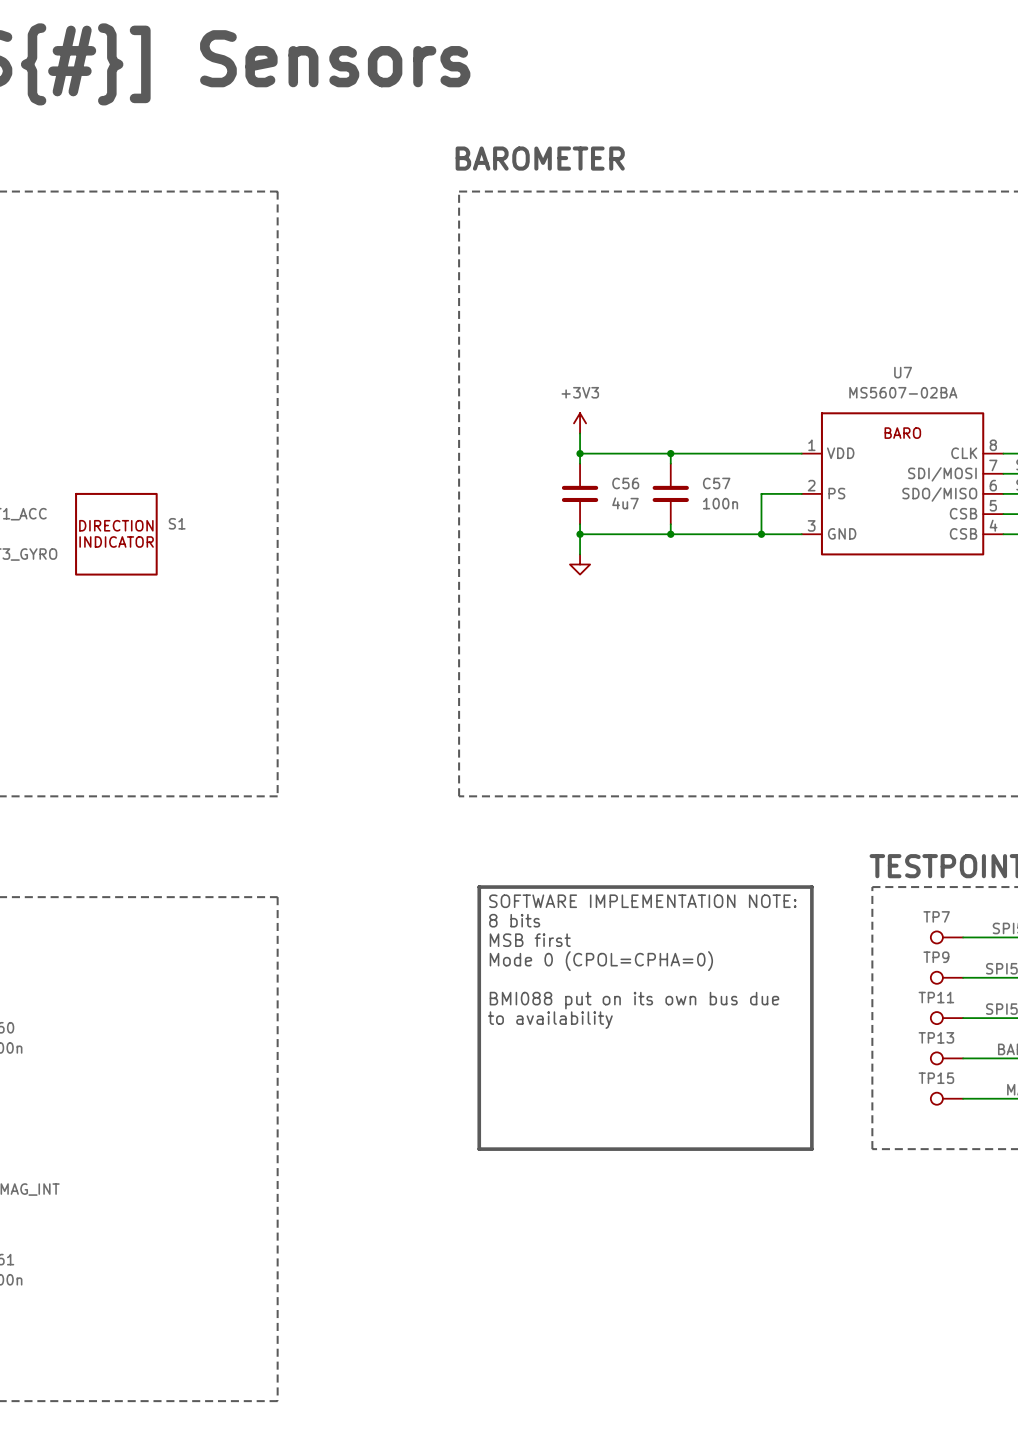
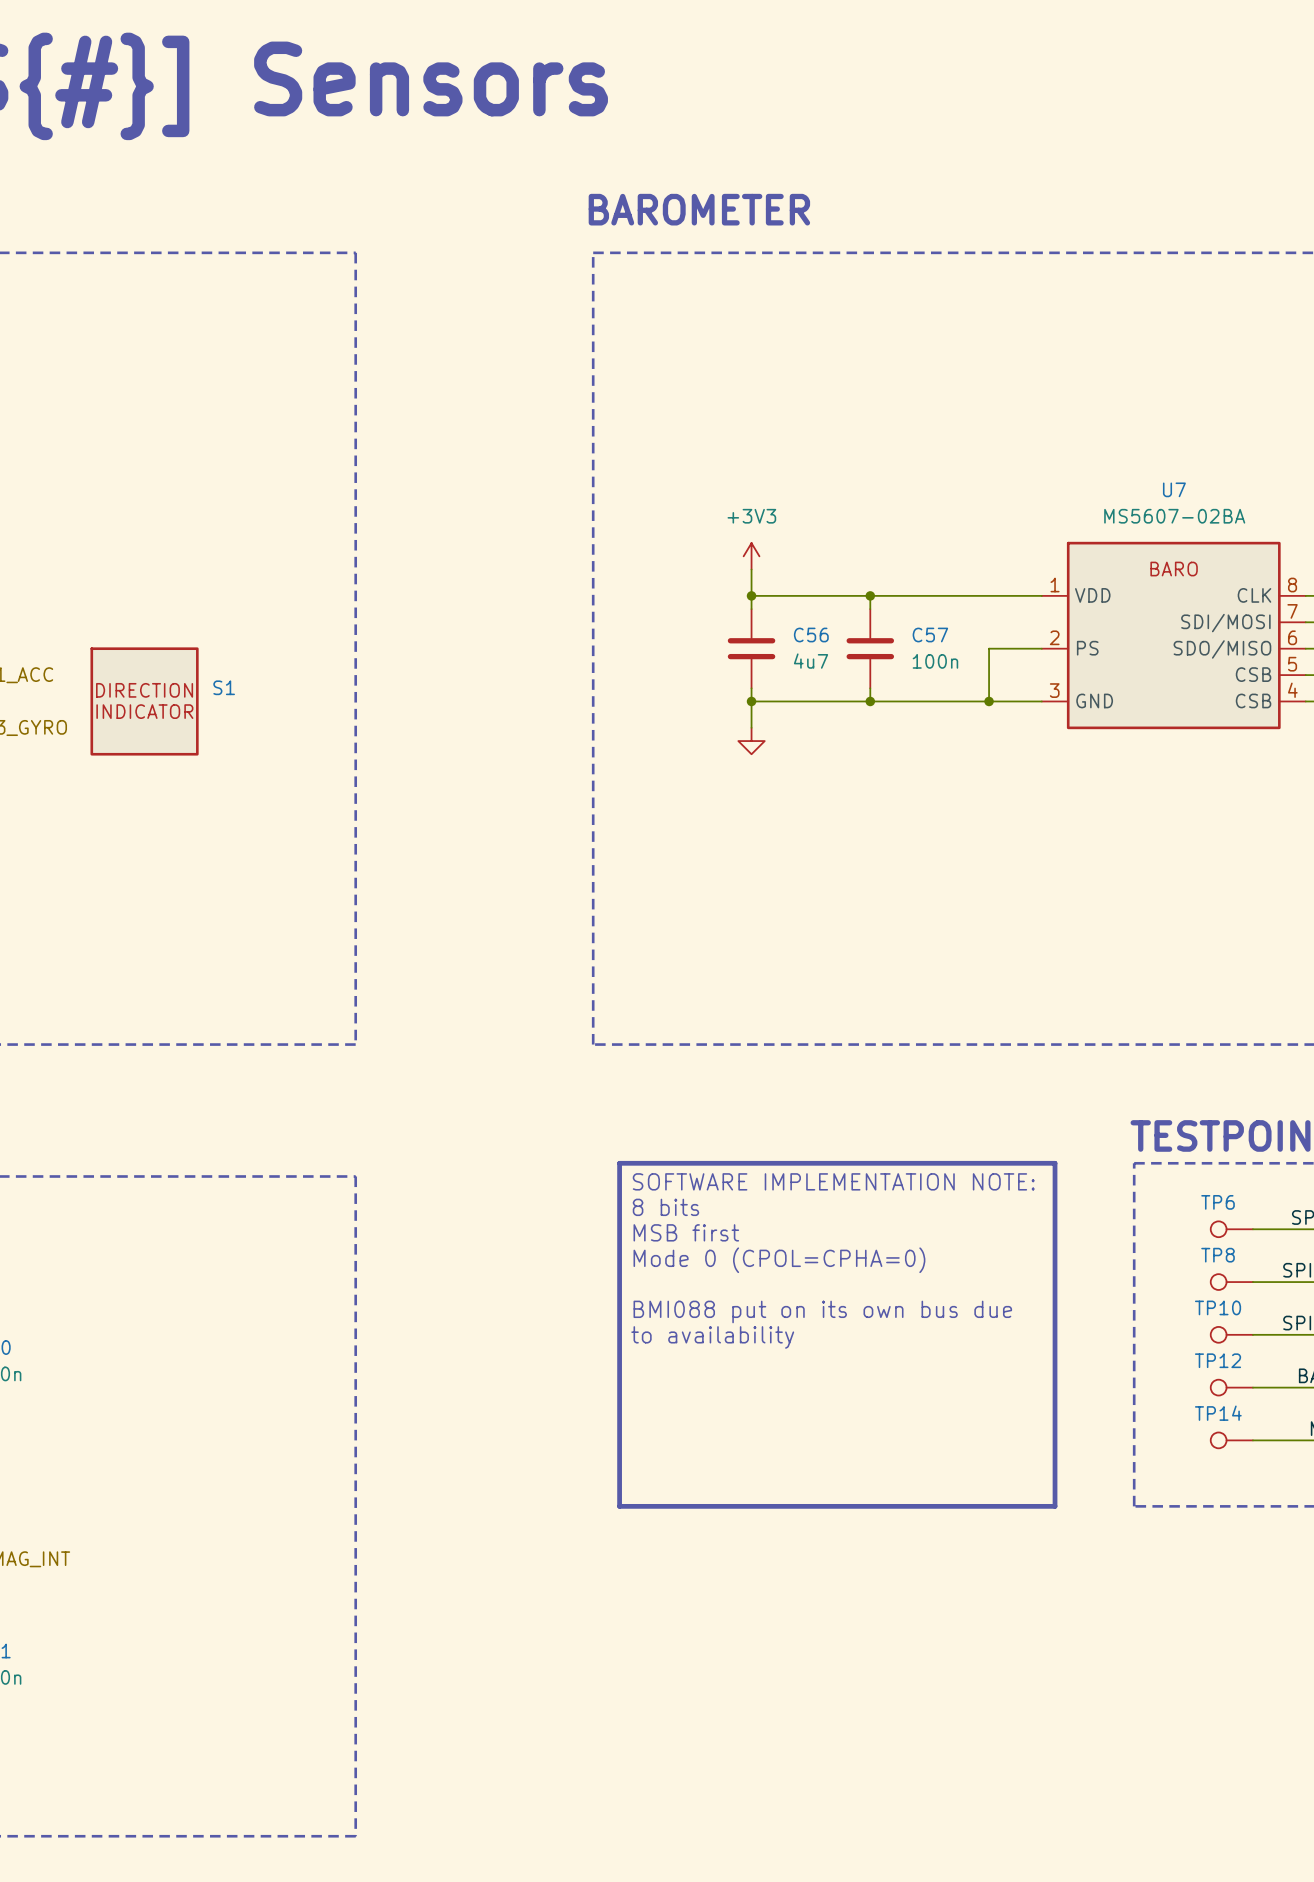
TP7 name: TP7 (936, 916) -> TP6 (1218, 1202)
TP9 name: TP9 (936, 957) -> TP8 (1218, 1255)
TP11 name: TP11 (936, 997) -> TP10 (1218, 1307)
TP13 name: TP13 (936, 1037) -> TP12 (1218, 1360)
TP15 name: TP15 (936, 1078) -> TP14 (1218, 1413)

